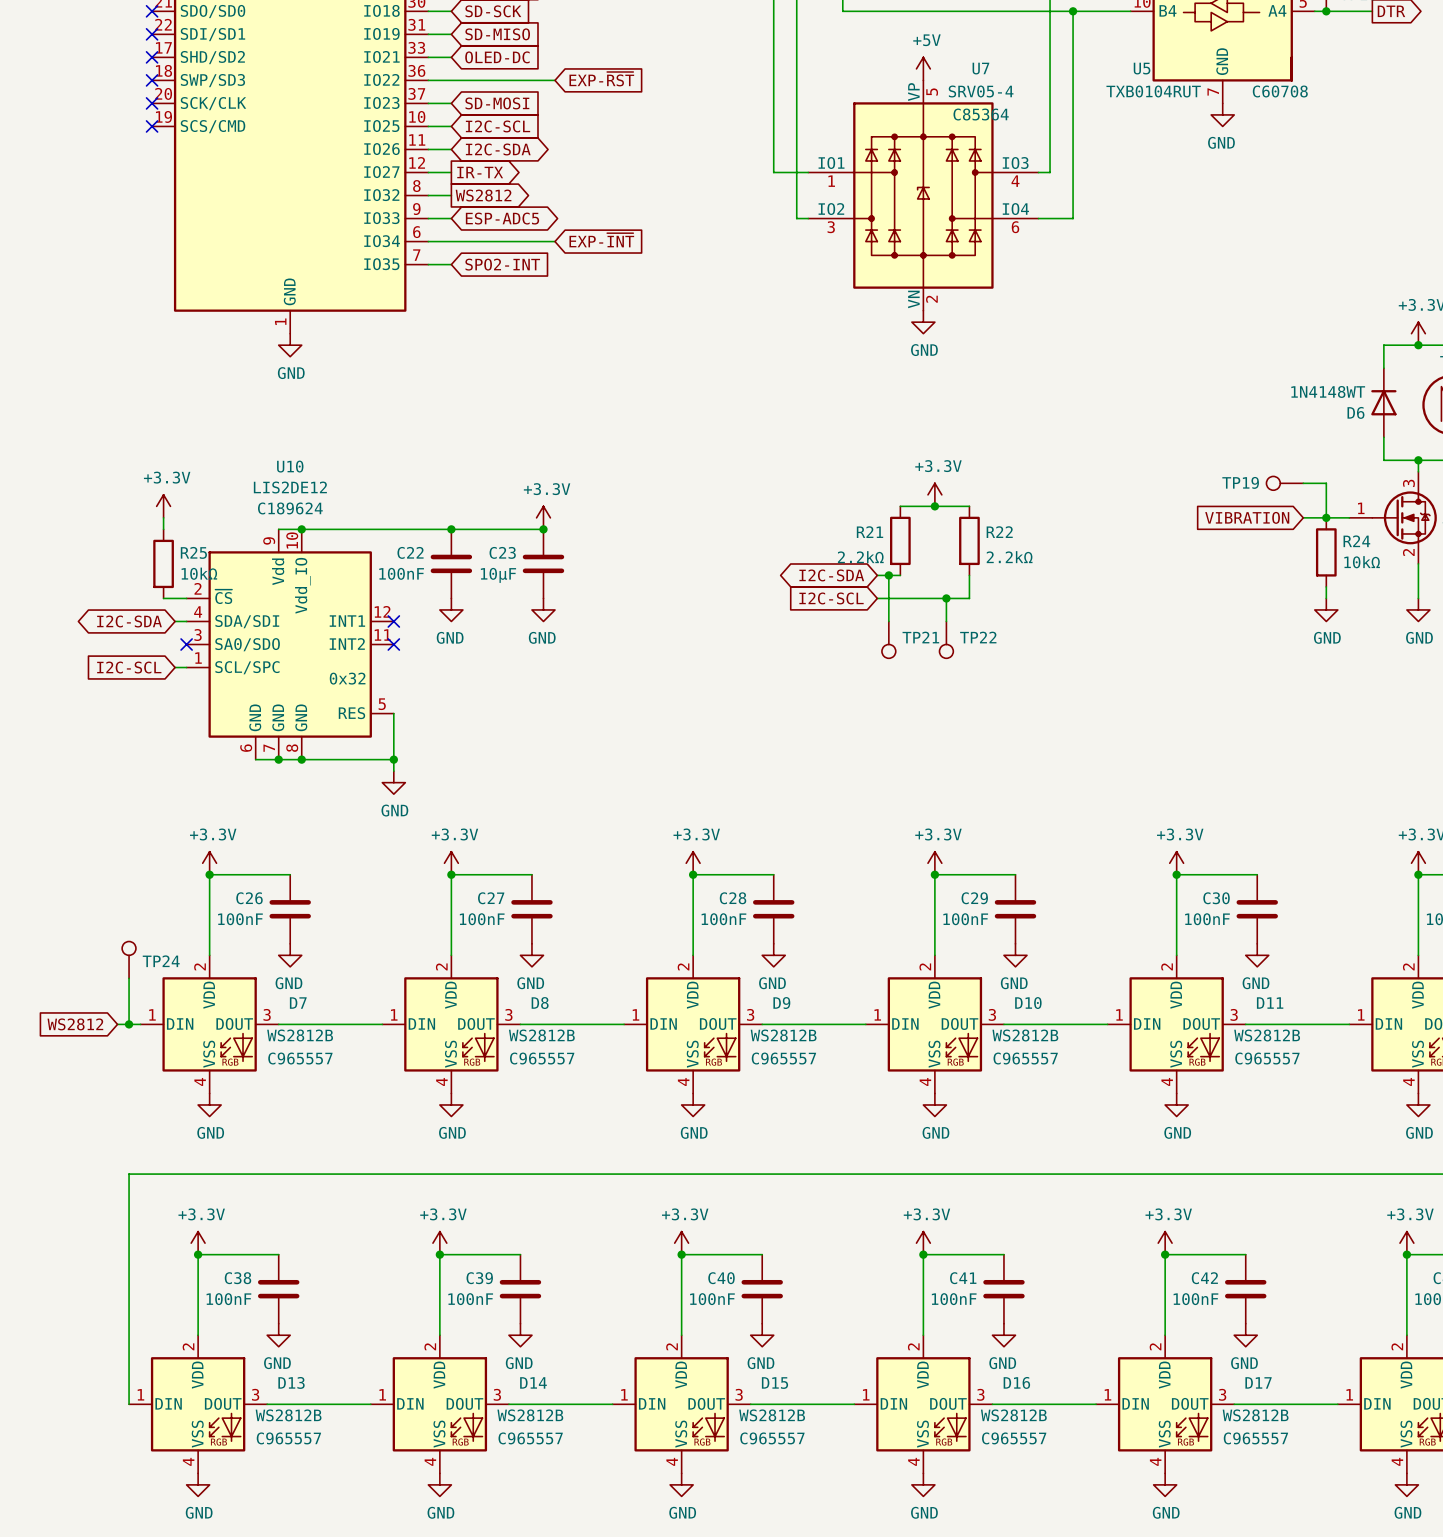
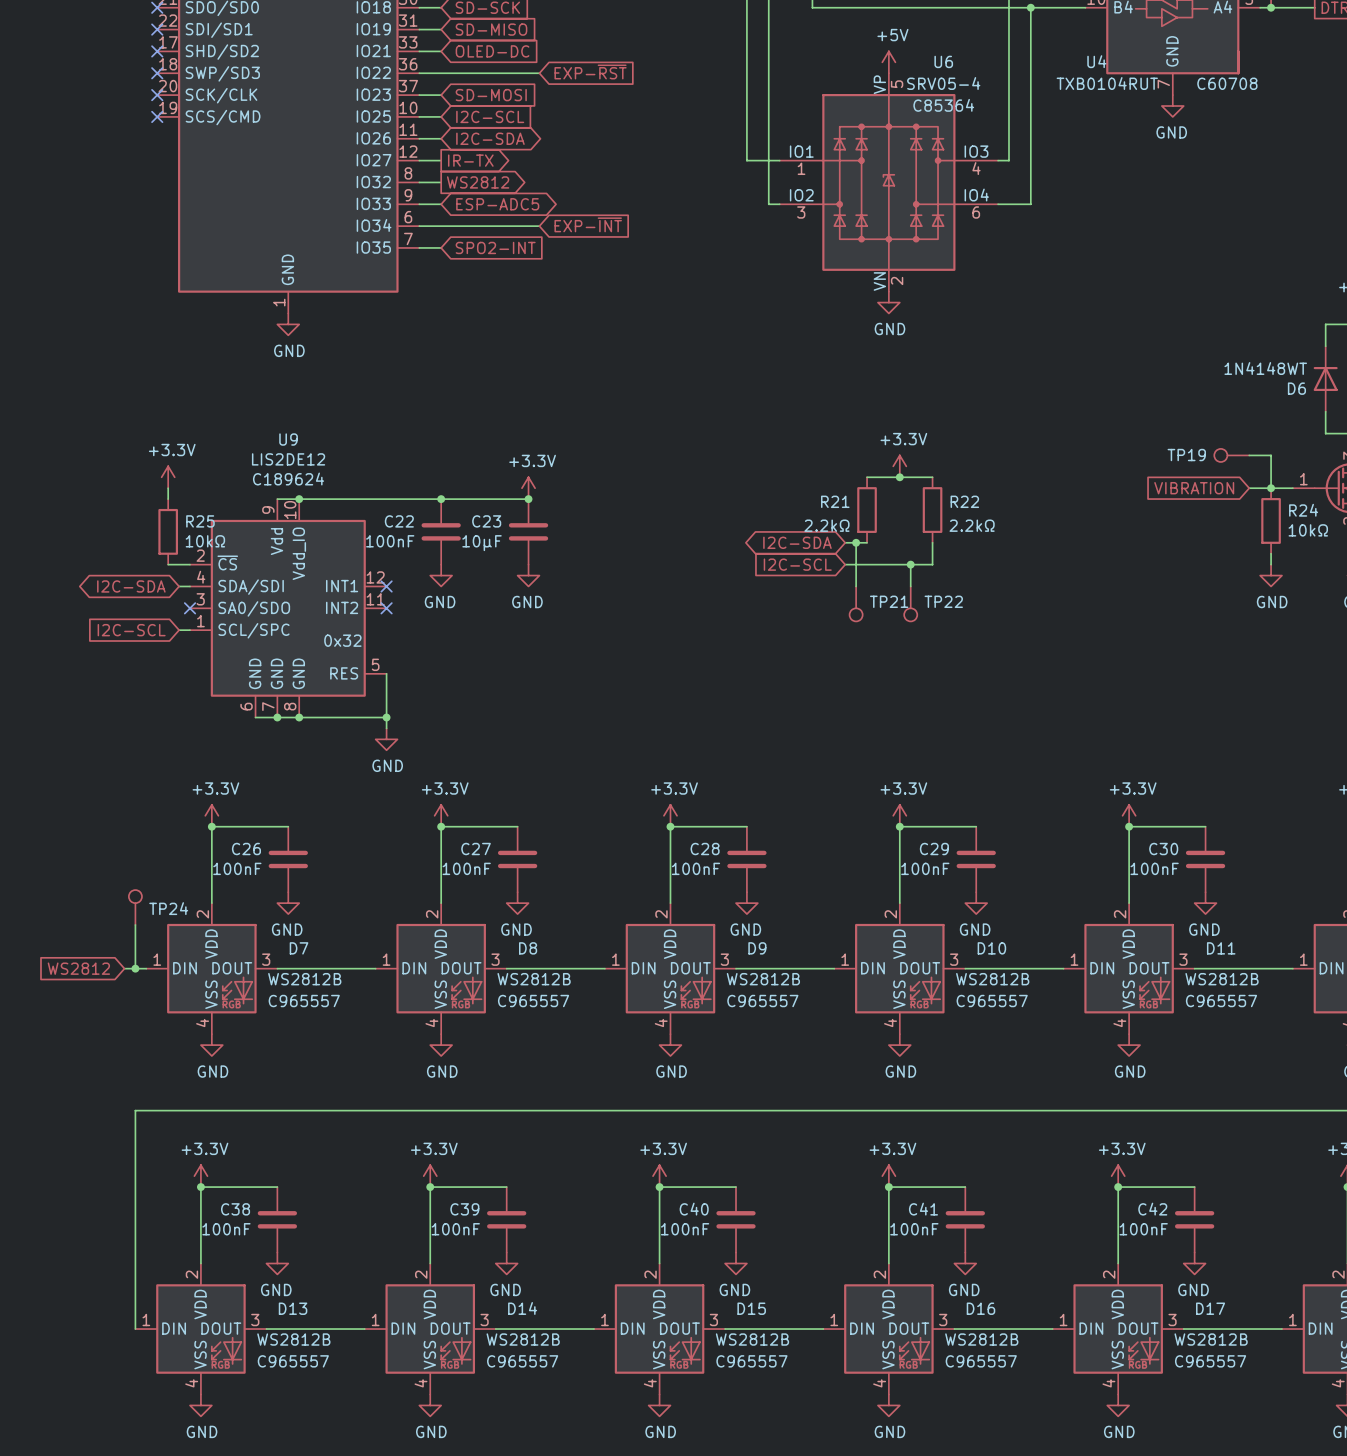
U7 name: U7 (980, 68) -> U6 (943, 61)
U5 name: U5 (1142, 68) -> U4 (1096, 61)
U10 name: U10 (290, 466) -> U9 (288, 439)

